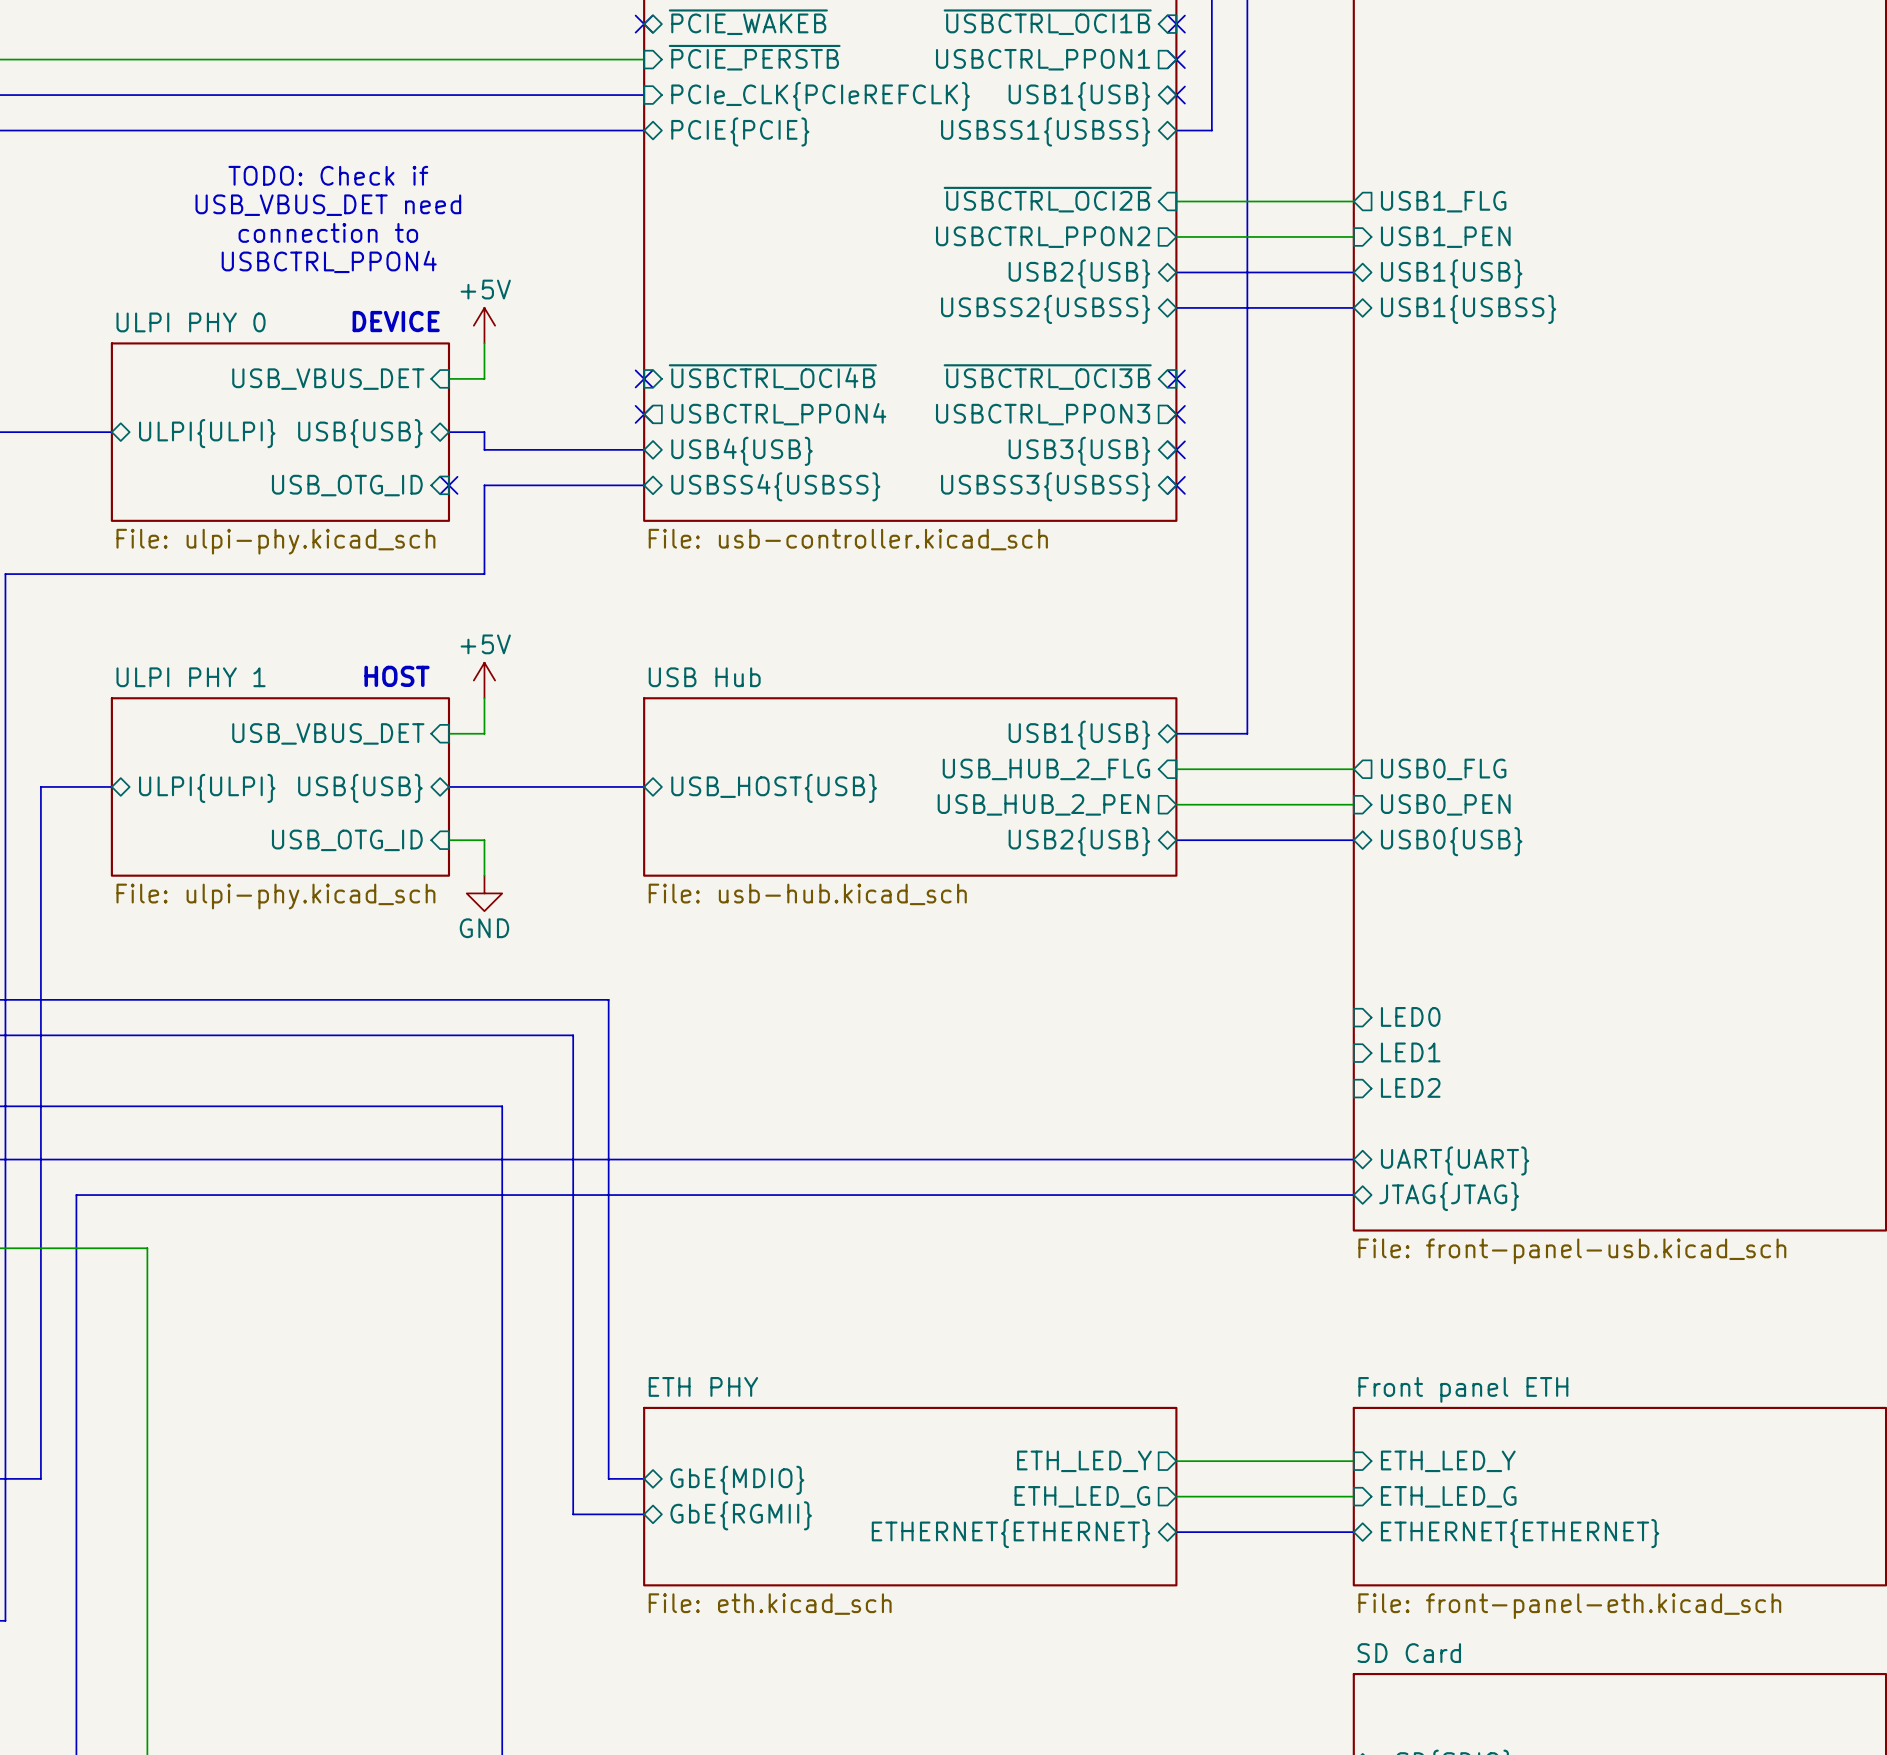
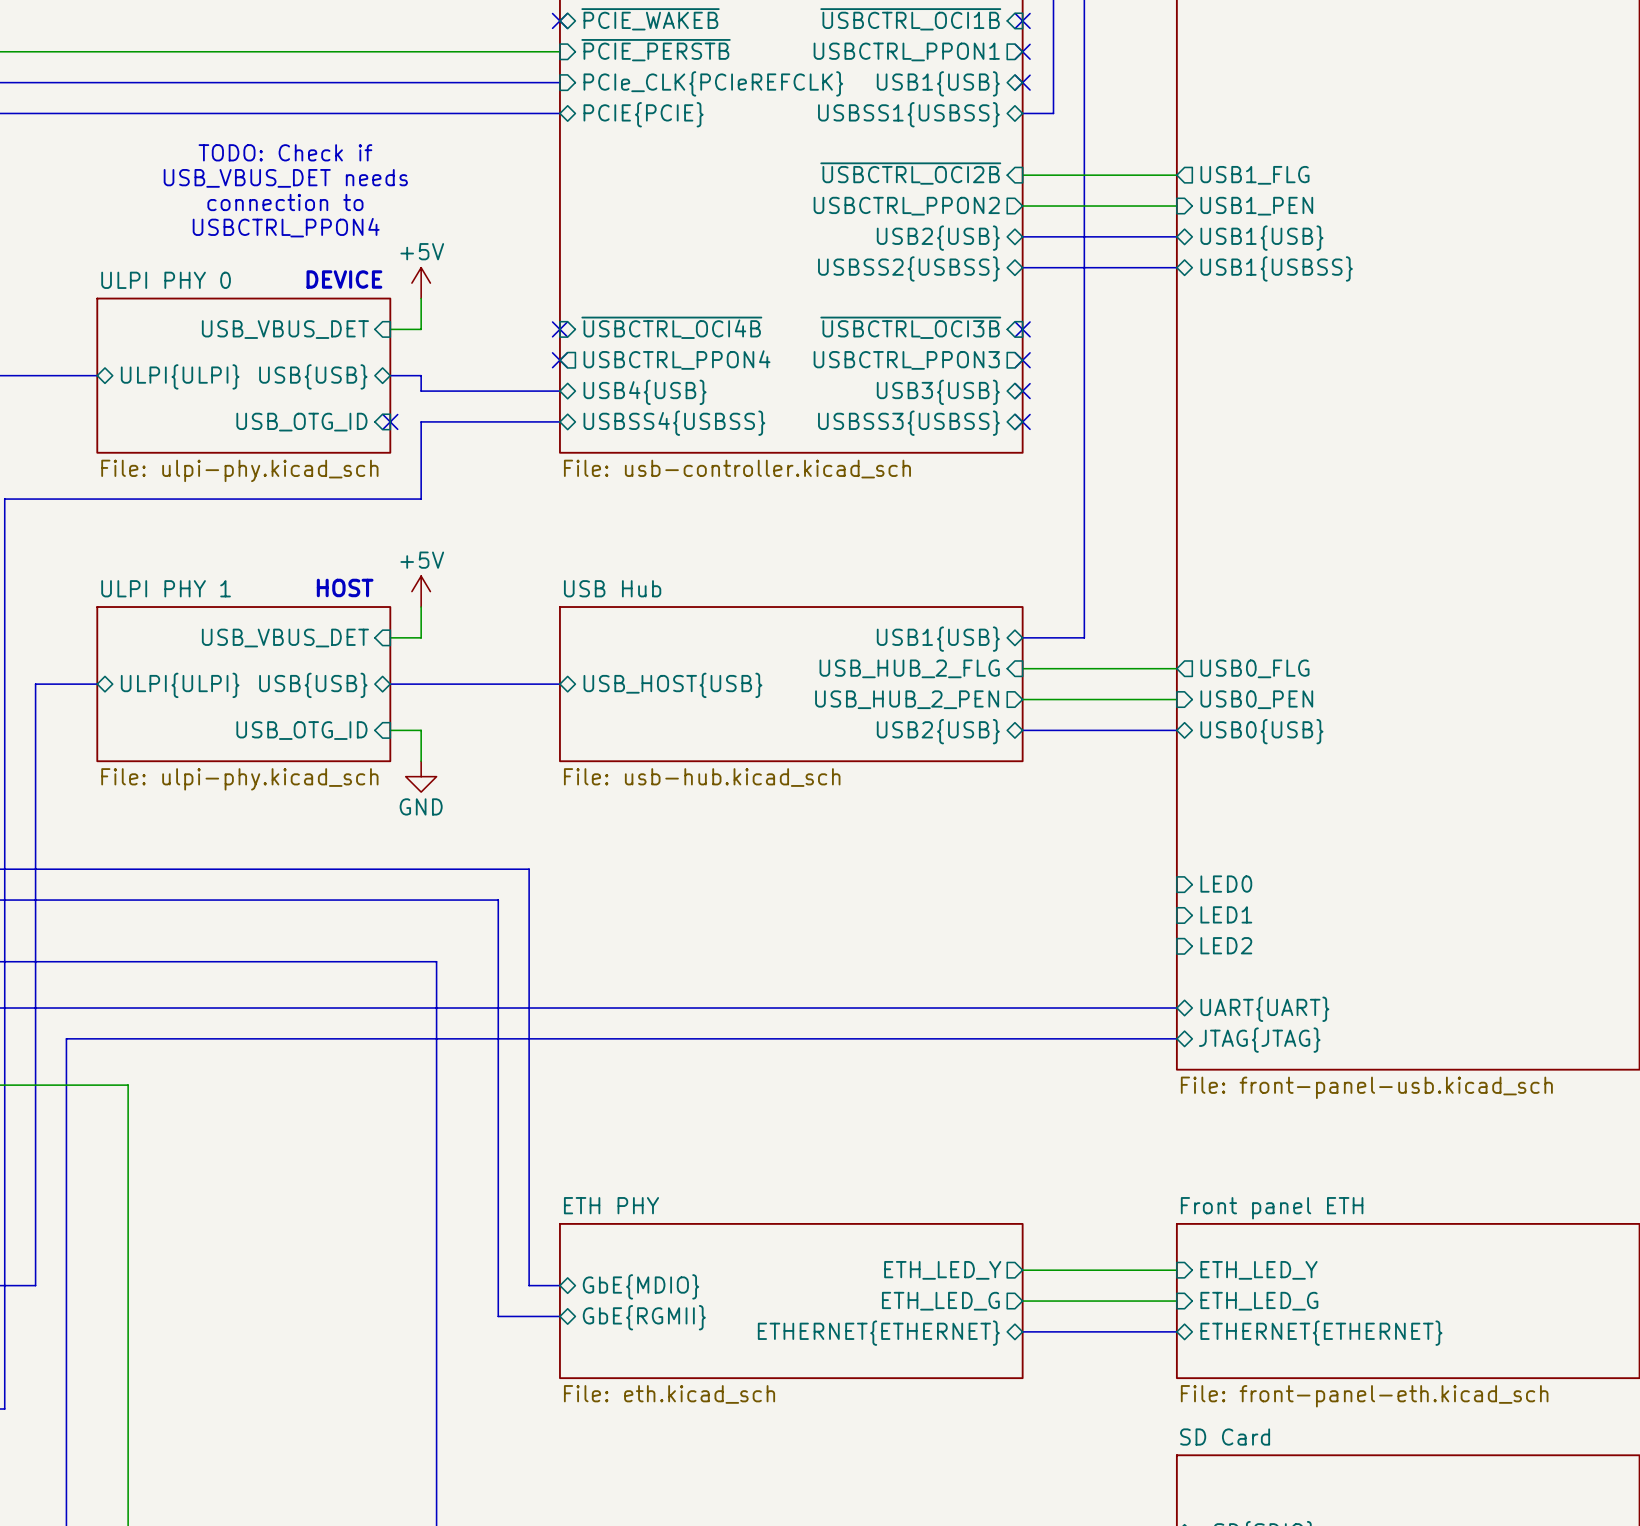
text: USB_VBUS_DET need (328, 205) -> USB_VBUS_DET needs (285, 178)

